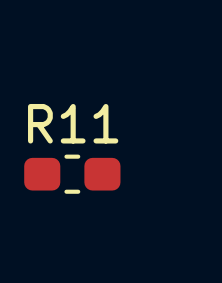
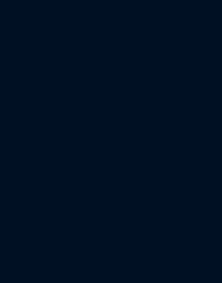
R11: (72, 174) -> none

